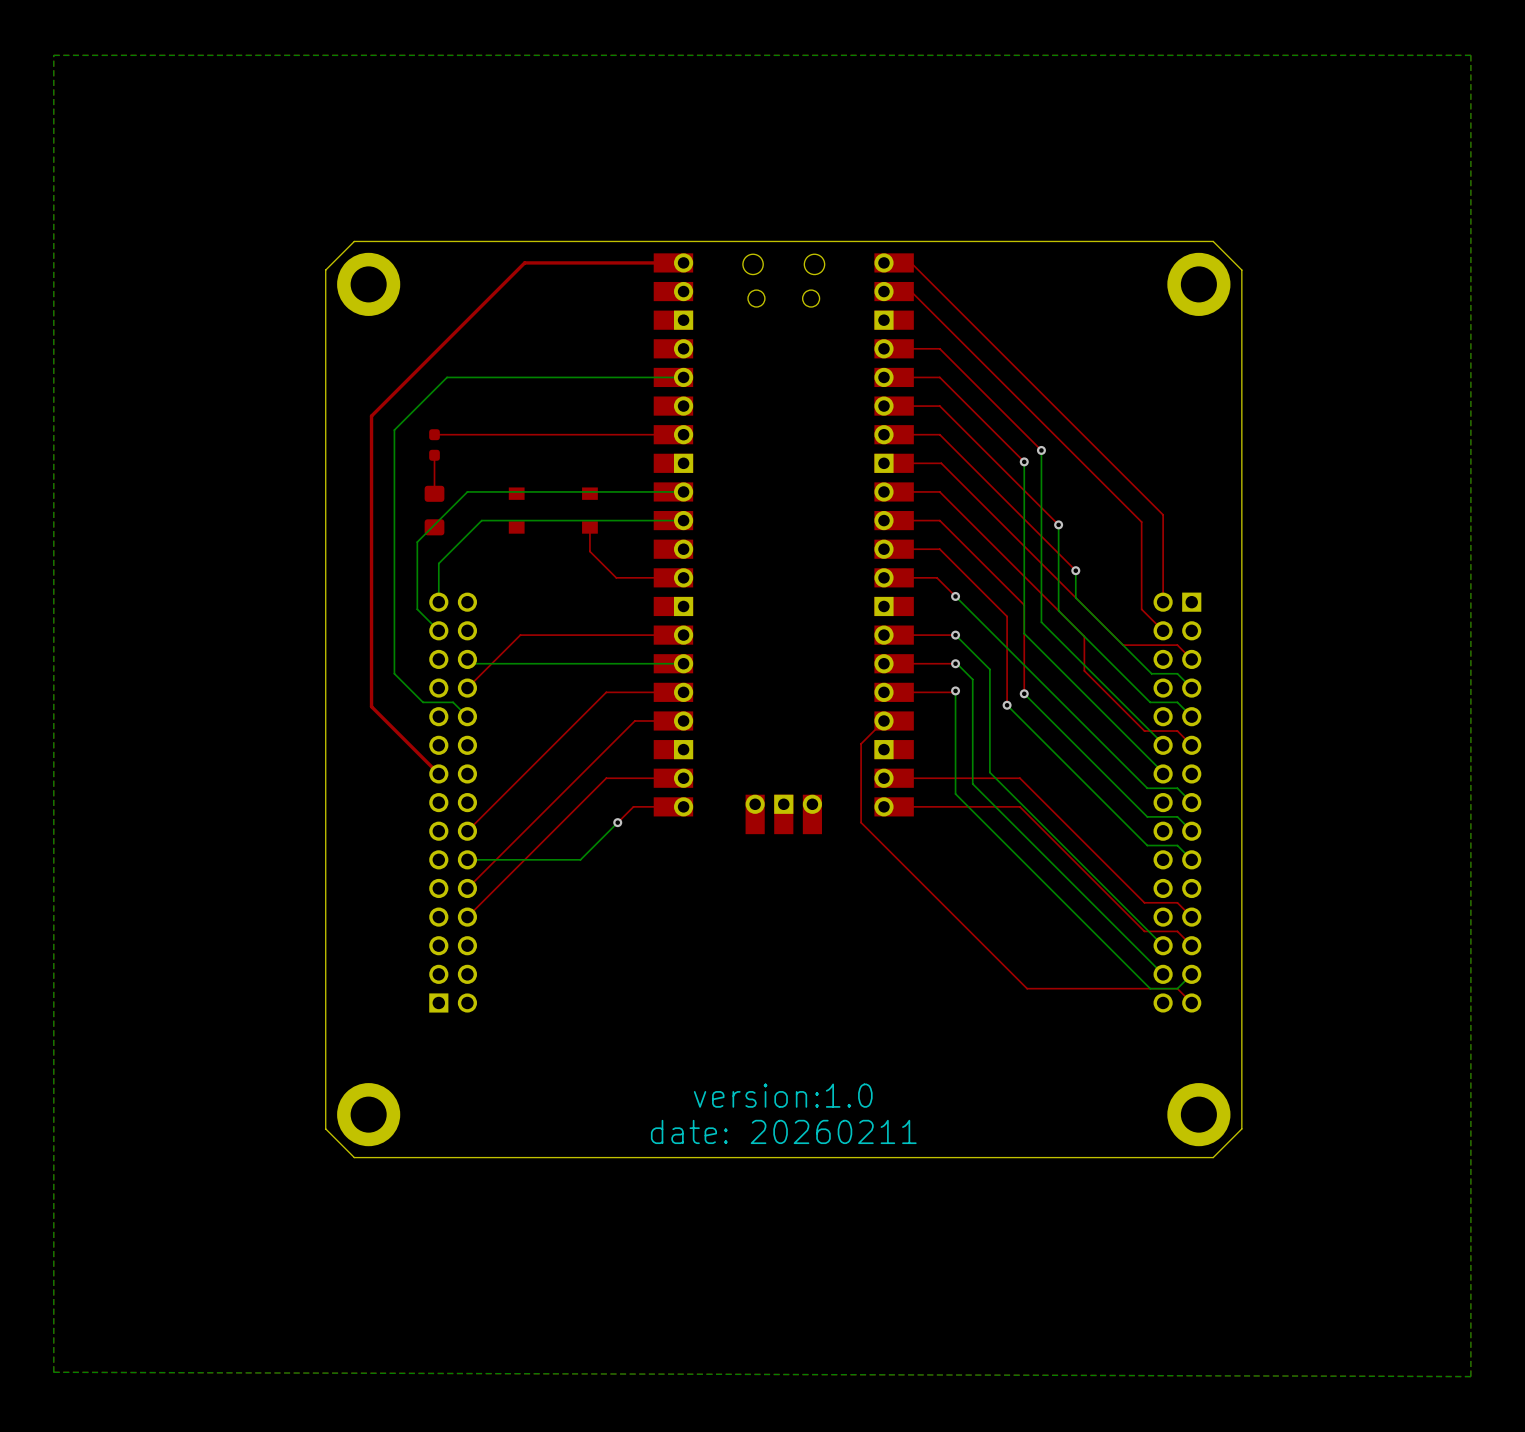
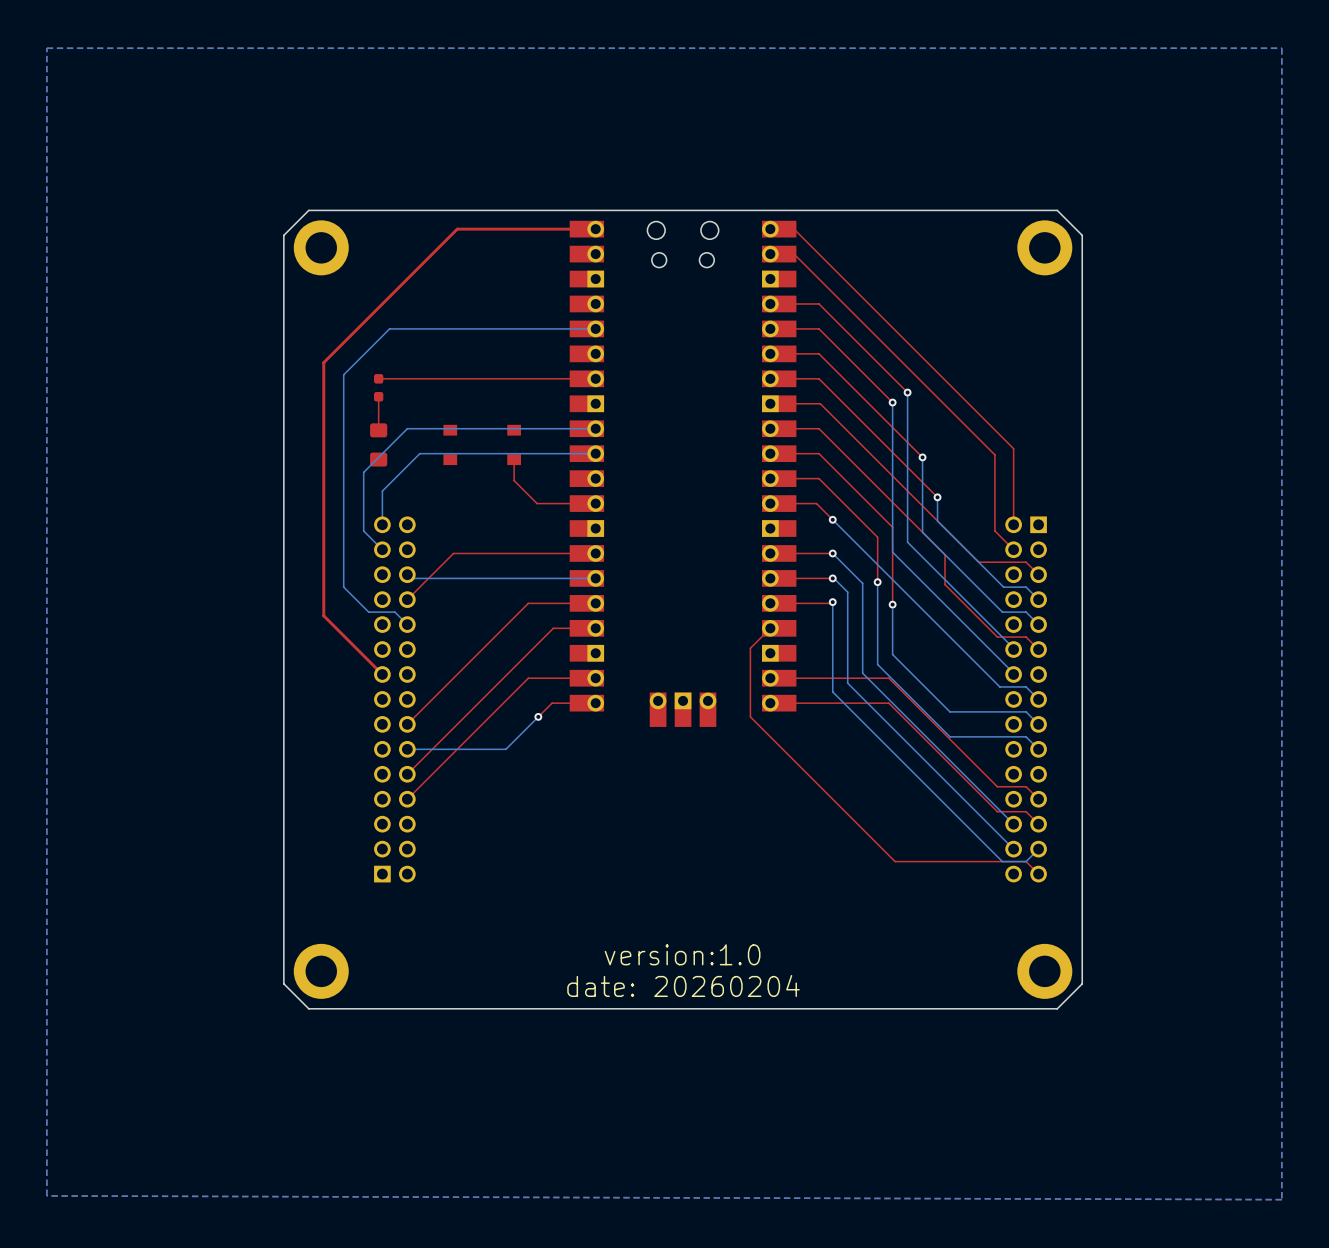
top track: (1007, 668) (1007, 705) -> none
bottom track: (1024, 693) (1147, 816) -> (892, 609) (892, 654) (950, 711) (999, 711)
bottom track: (1007, 705) (1147, 845) -> (877, 582) (877, 664) (950, 736) (999, 736)
via position: (1007, 705) -> (877, 582)
text: date: 20260211 (783, 1131) -> date: 20260204 (683, 985)

